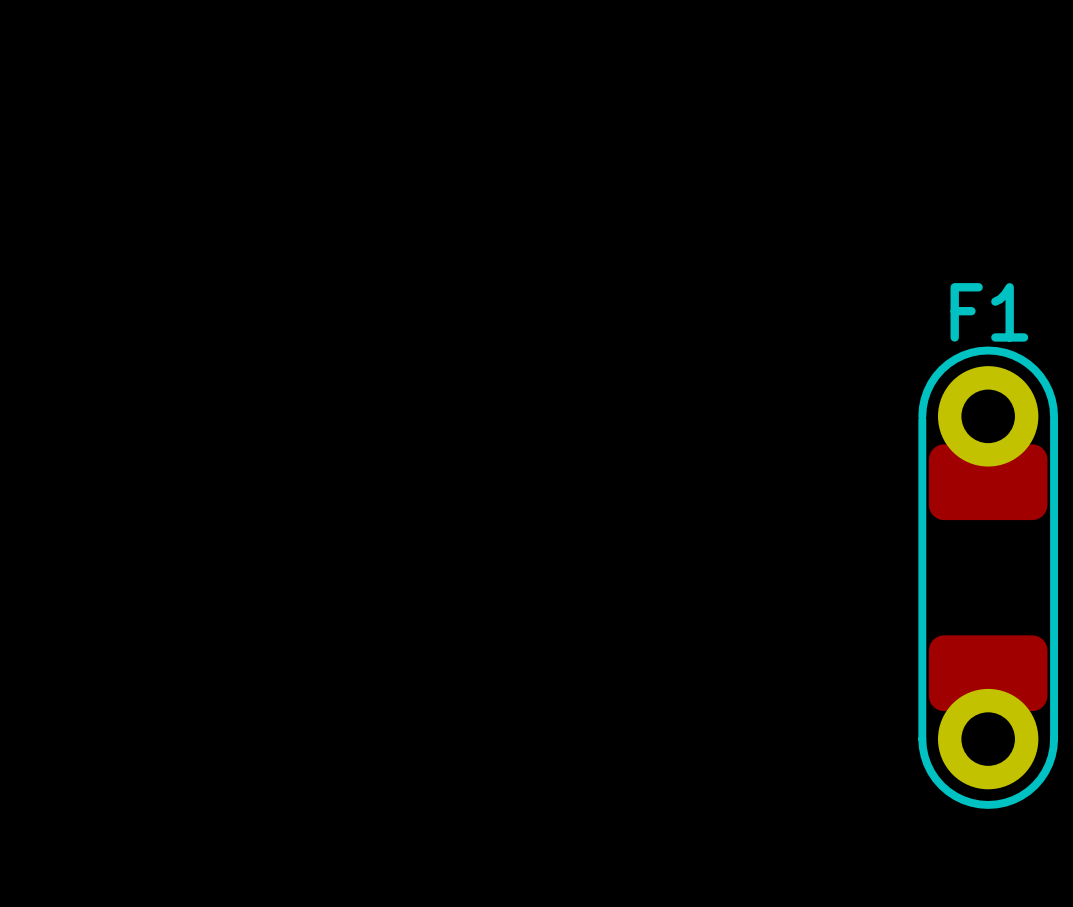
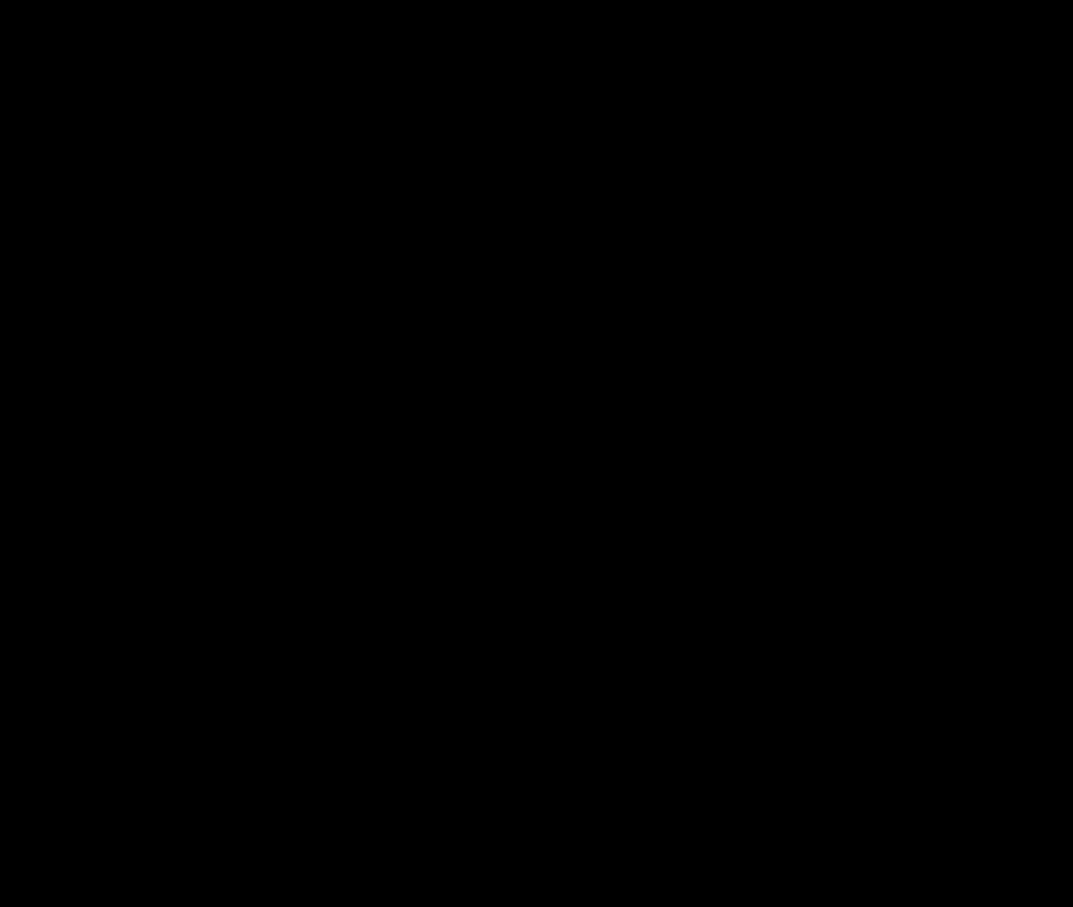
F1: (988, 577) -> none

